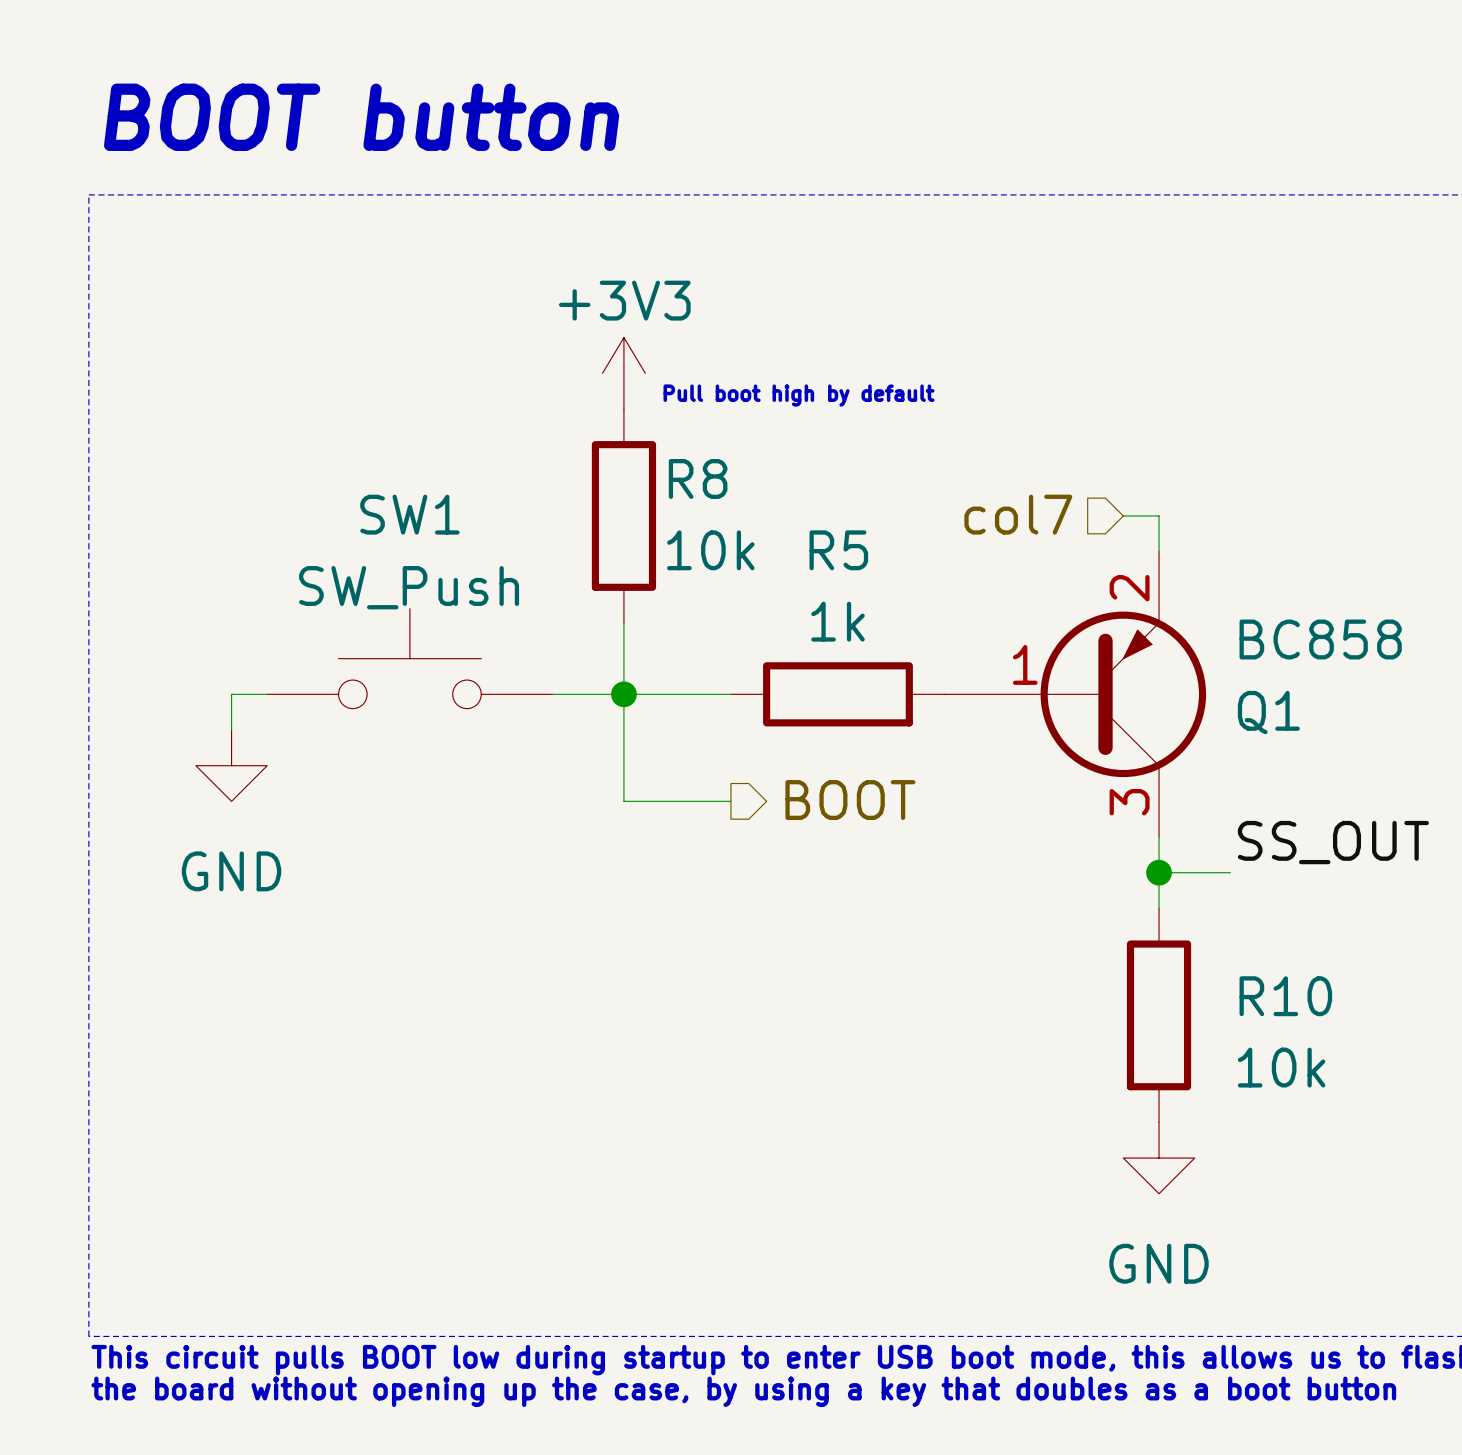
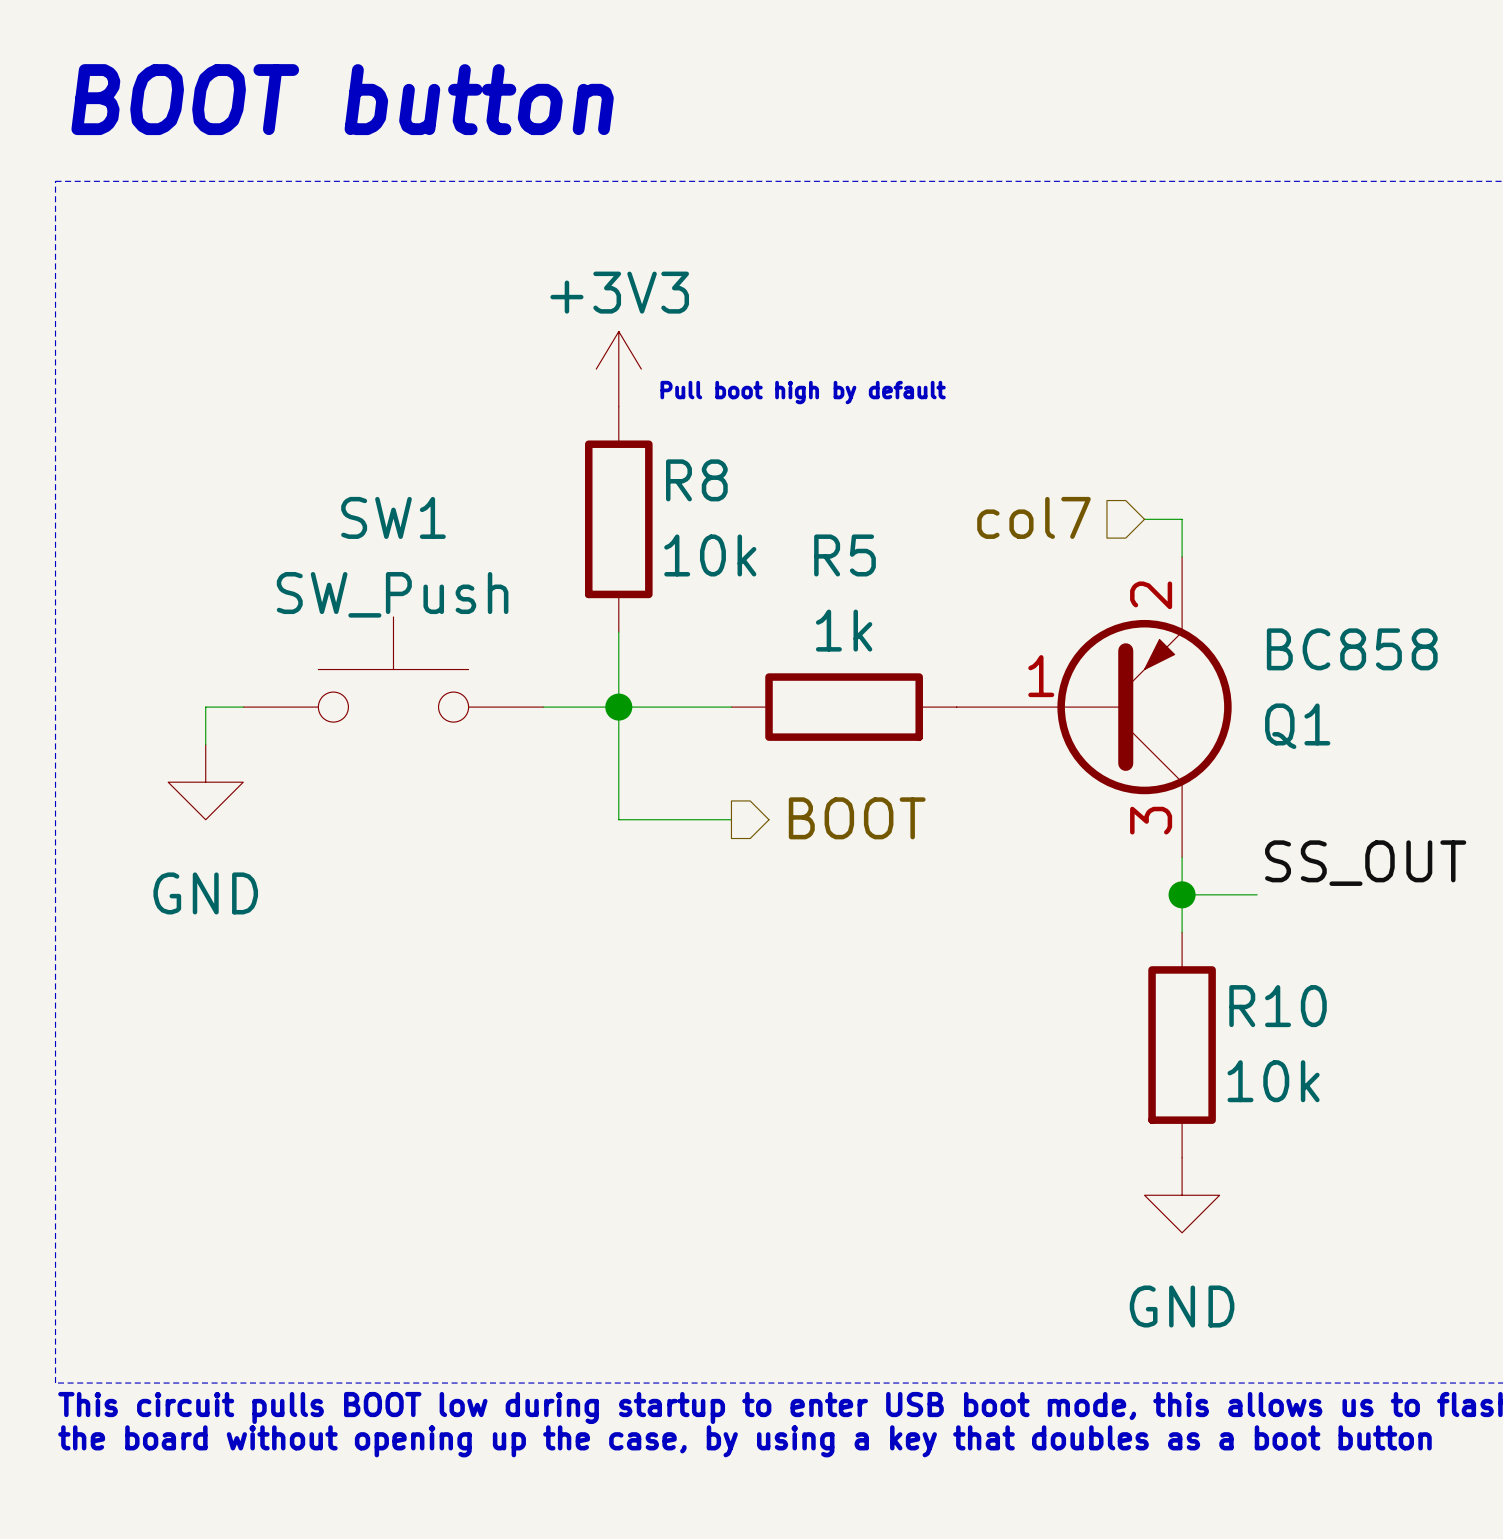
R10 name position: R10 (1285, 996) -> R10 (1278, 1006)
R10 value position: 10k (1281, 1067) -> 10k (1273, 1081)

